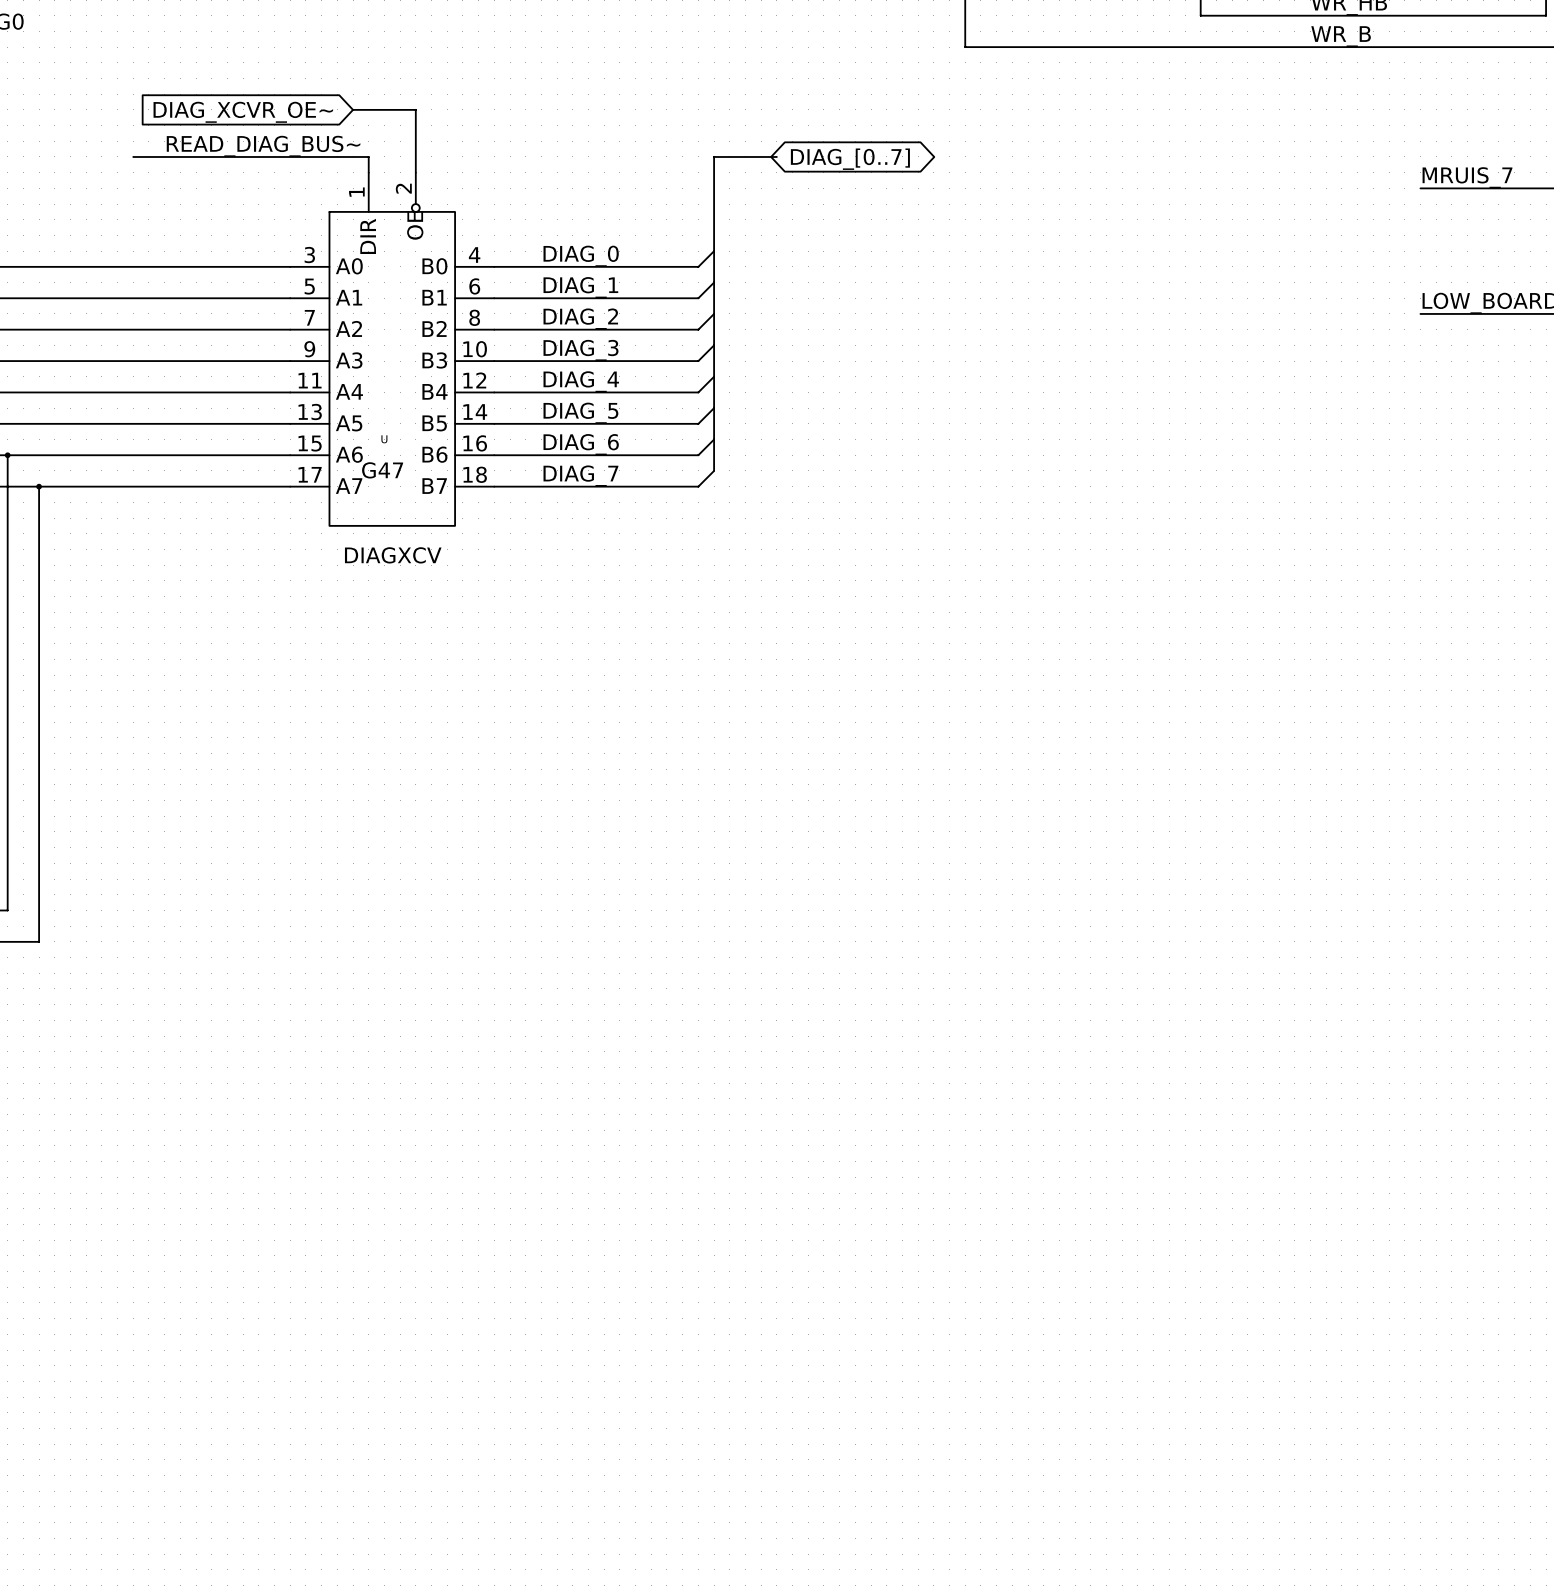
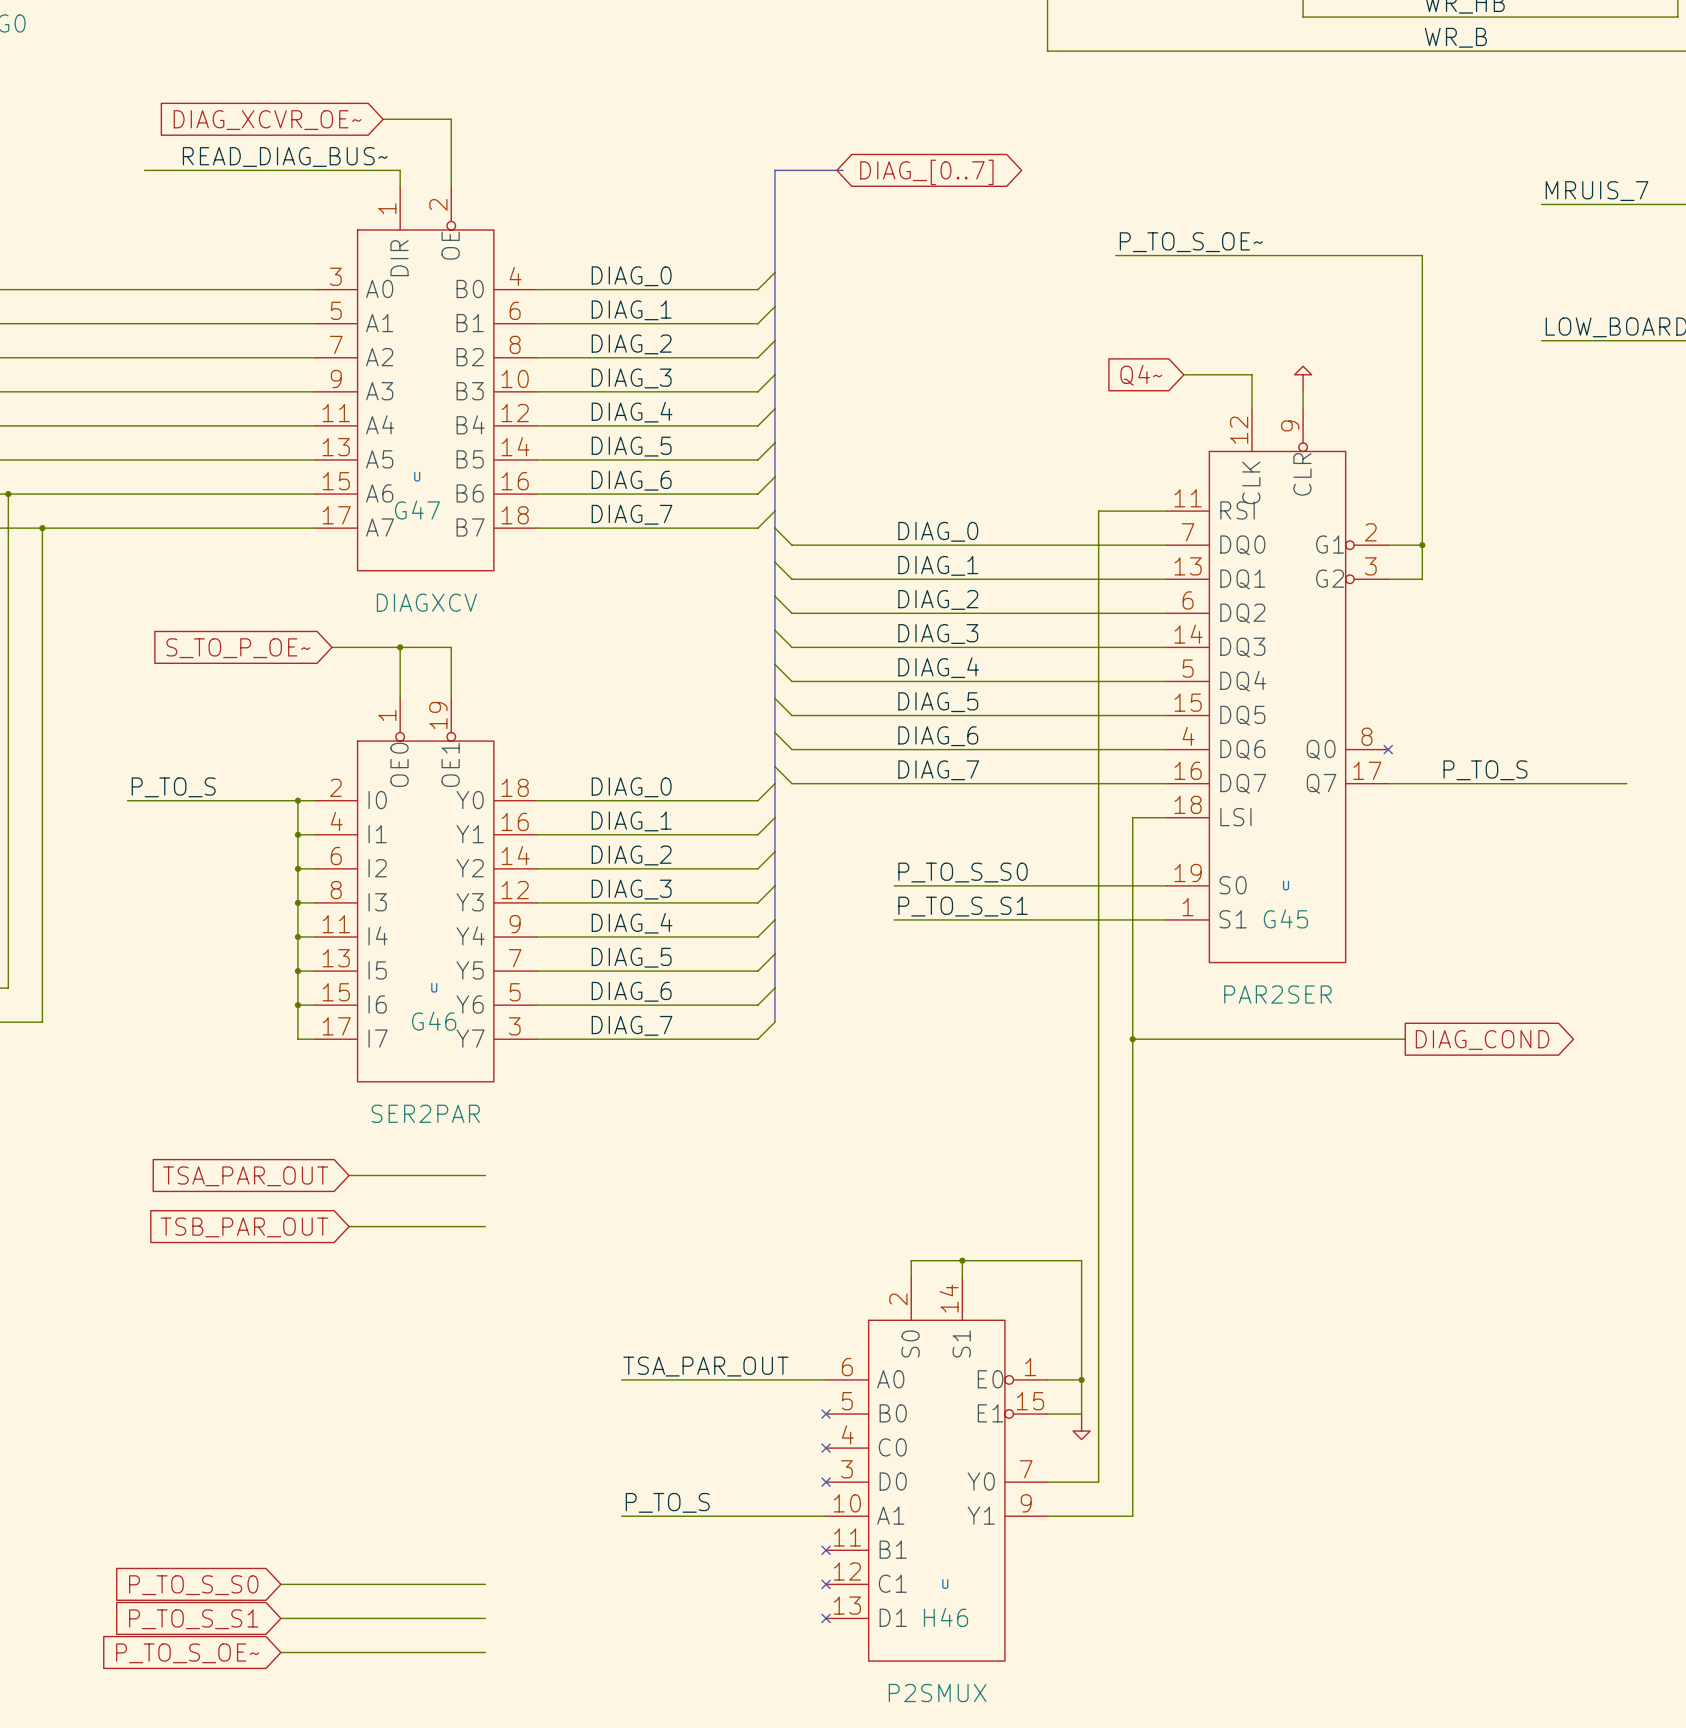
label: none -> P_TO_S_OE~ (1191, 242)
wire: none -> (1115, 255) (1422, 255) (1422, 579) (1388, 579)
wire: none -> (1183, 374) (1251, 374) (1251, 408)
global label: none -> Q4~ (1141, 375)
power symbol: none -> (1303, 378)
wire: none -> (1303, 391) (1303, 408)
bus: none -> (774, 511) (774, 1022)
wire: none -> (1166, 511) (1098, 511) (1098, 1482) (1047, 1482)
wire: none -> (774, 528) (791, 545) (1166, 545)
label: none -> DIAG_0 (938, 531)
wire: none -> (1388, 545) (1422, 545)
junction: none -> (1422, 545)
wire: none -> (774, 562) (791, 579) (1166, 579)
label: none -> DIAG_1 (938, 565)
wire: none -> (774, 596) (791, 613) (1166, 613)
label: none -> DIAG_2 (938, 599)
wire: none -> (774, 630) (791, 647) (1166, 647)
label: none -> DIAG_3 (938, 634)
wire: none -> (332, 647) (451, 647) (451, 698)
wire: none -> (400, 647) (400, 698)
junction: none -> (400, 647)
global label: none -> S_TO_P_OE~ (238, 648)
wire: none -> (774, 664) (791, 681) (1166, 681)
label: none -> DIAG_4 (938, 667)
U: none -> (1277, 685)
wire: none -> (774, 698) (791, 715) (1166, 715)
label: none -> DIAG_5 (938, 702)
wire: none -> (774, 732) (791, 749) (1166, 749)
label: none -> DIAG_6 (938, 736)
no-connect mark: none -> (1388, 749)
wire: none -> (774, 766) (791, 783) (1166, 783)
label: none -> DIAG_7 (938, 770)
label: none -> P_TO_S (1485, 770)
wire: none -> (774, 783) (757, 800) (536, 800)
wire: none -> (1388, 783) (1626, 783)
label: none -> P_TO_S (173, 787)
label: none -> DIAG_0 (631, 787)
wire: none -> (127, 800) (314, 800)
wire: none -> (297, 800) (297, 1039) (314, 1039)
junction: none -> (297, 800)
wire: none -> (774, 817) (757, 834) (536, 834)
wire: none -> (1166, 817) (1132, 817) (1132, 1516) (1047, 1516)
label: none -> DIAG_1 (631, 821)
wire: none -> (297, 834) (314, 834)
junction: none -> (297, 834)
wire: none -> (774, 851) (757, 868) (536, 868)
label: none -> DIAG_2 (631, 855)
wire: none -> (297, 868) (314, 868)
junction: none -> (297, 868)
label: none -> P_TO_S_S0 (963, 872)
wire: none -> (774, 885) (757, 902) (536, 902)
wire: none -> (894, 885) (1166, 885)
U: none -> (425, 890)
label: none -> DIAG_3 (631, 889)
wire: none -> (297, 902) (314, 902)
junction: none -> (297, 902)
label: none -> P_TO_S_S1 (963, 906)
wire: none -> (774, 919) (757, 937) (536, 937)
wire: none -> (894, 919) (1166, 919)
label: none -> DIAG_4 (632, 923)
wire: none -> (297, 937) (314, 937)
junction: none -> (297, 937)
wire: none -> (774, 954) (757, 971) (536, 971)
label: none -> DIAG_5 (631, 957)
wire: none -> (297, 971) (314, 971)
junction: none -> (297, 971)
wire: none -> (774, 988) (757, 1005) (536, 1005)
label: none -> DIAG_6 (631, 991)
wire: none -> (297, 1005) (314, 1005)
junction: none -> (297, 1005)
wire: none -> (774, 1022) (757, 1039) (536, 1039)
label: none -> DIAG_7 (632, 1025)
wire: none -> (1132, 1039) (1405, 1039)
junction: none -> (1132, 1039)
global label: none -> DIAG_COND (1482, 1040)
wire: none -> (349, 1175) (485, 1175)
global label: none -> TSA_PAR_OUT (245, 1176)
wire: none -> (349, 1226) (485, 1226)
global label: none -> TSB_PAR_OUT (244, 1227)
wire: none -> (962, 1260) (962, 1277)
junction: none -> (962, 1260)
wire: none -> (911, 1277) (911, 1260) (1081, 1260) (1081, 1414) (1047, 1414)
label: none -> TSA_PAR_OUT (705, 1366)
wire: none -> (621, 1379) (826, 1379)
wire: none -> (1047, 1379) (1081, 1379)
junction: none -> (1081, 1379)
no-connect mark: none -> (826, 1414)
power symbol: none -> (1081, 1427)
no-connect mark: none -> (826, 1448)
U: none -> (936, 1469)
no-connect mark: none -> (826, 1482)
label: none -> P_TO_S (667, 1502)
wire: none -> (621, 1516) (826, 1516)
no-connect mark: none -> (826, 1550)
wire: none -> (280, 1584) (485, 1584)
no-connect mark: none -> (826, 1584)
global label: none -> P_TO_S_S0 (193, 1585)
wire: none -> (280, 1618) (485, 1618)
no-connect mark: none -> (826, 1618)
global label: none -> P_TO_S_S1 (193, 1619)
wire: none -> (280, 1652) (485, 1652)
global label: none -> P_TO_S_OE~ (187, 1653)

